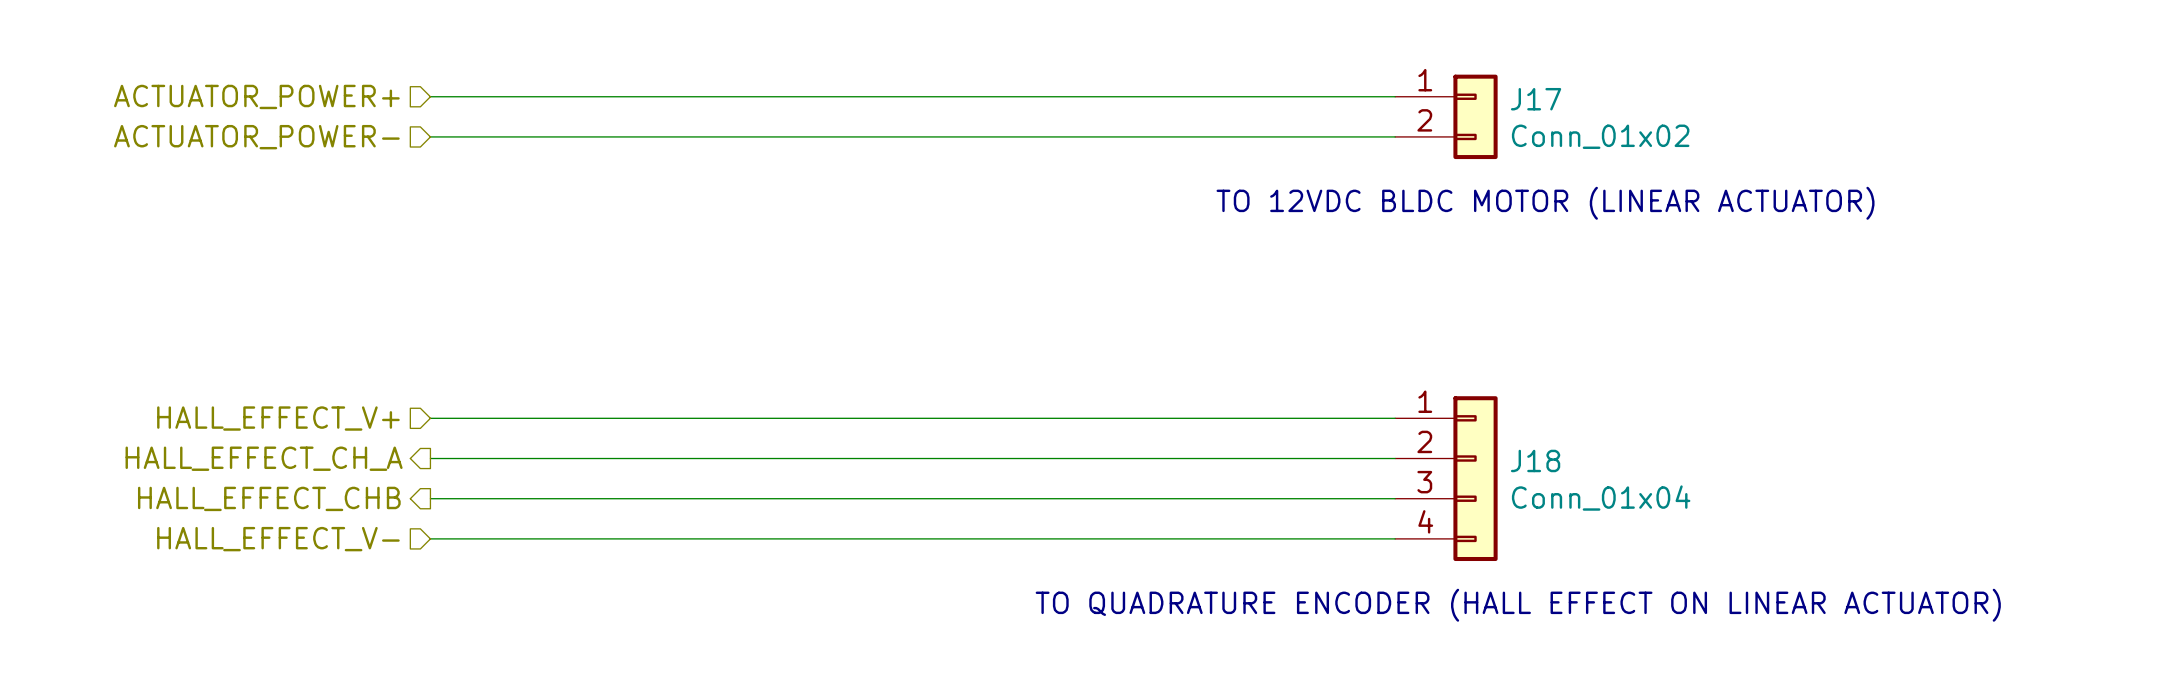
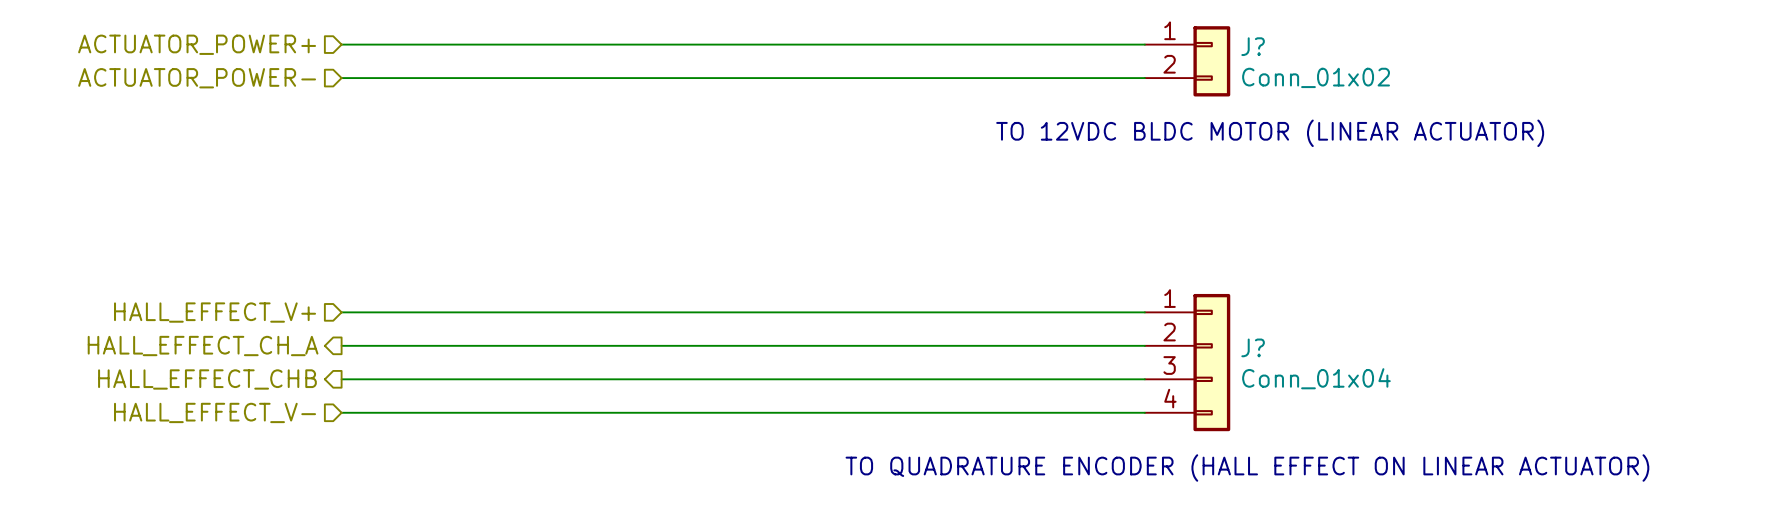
J17 name: J17 (1536, 99) -> J? (1253, 46)
J18 name: J18 (1535, 460) -> J? (1253, 347)

